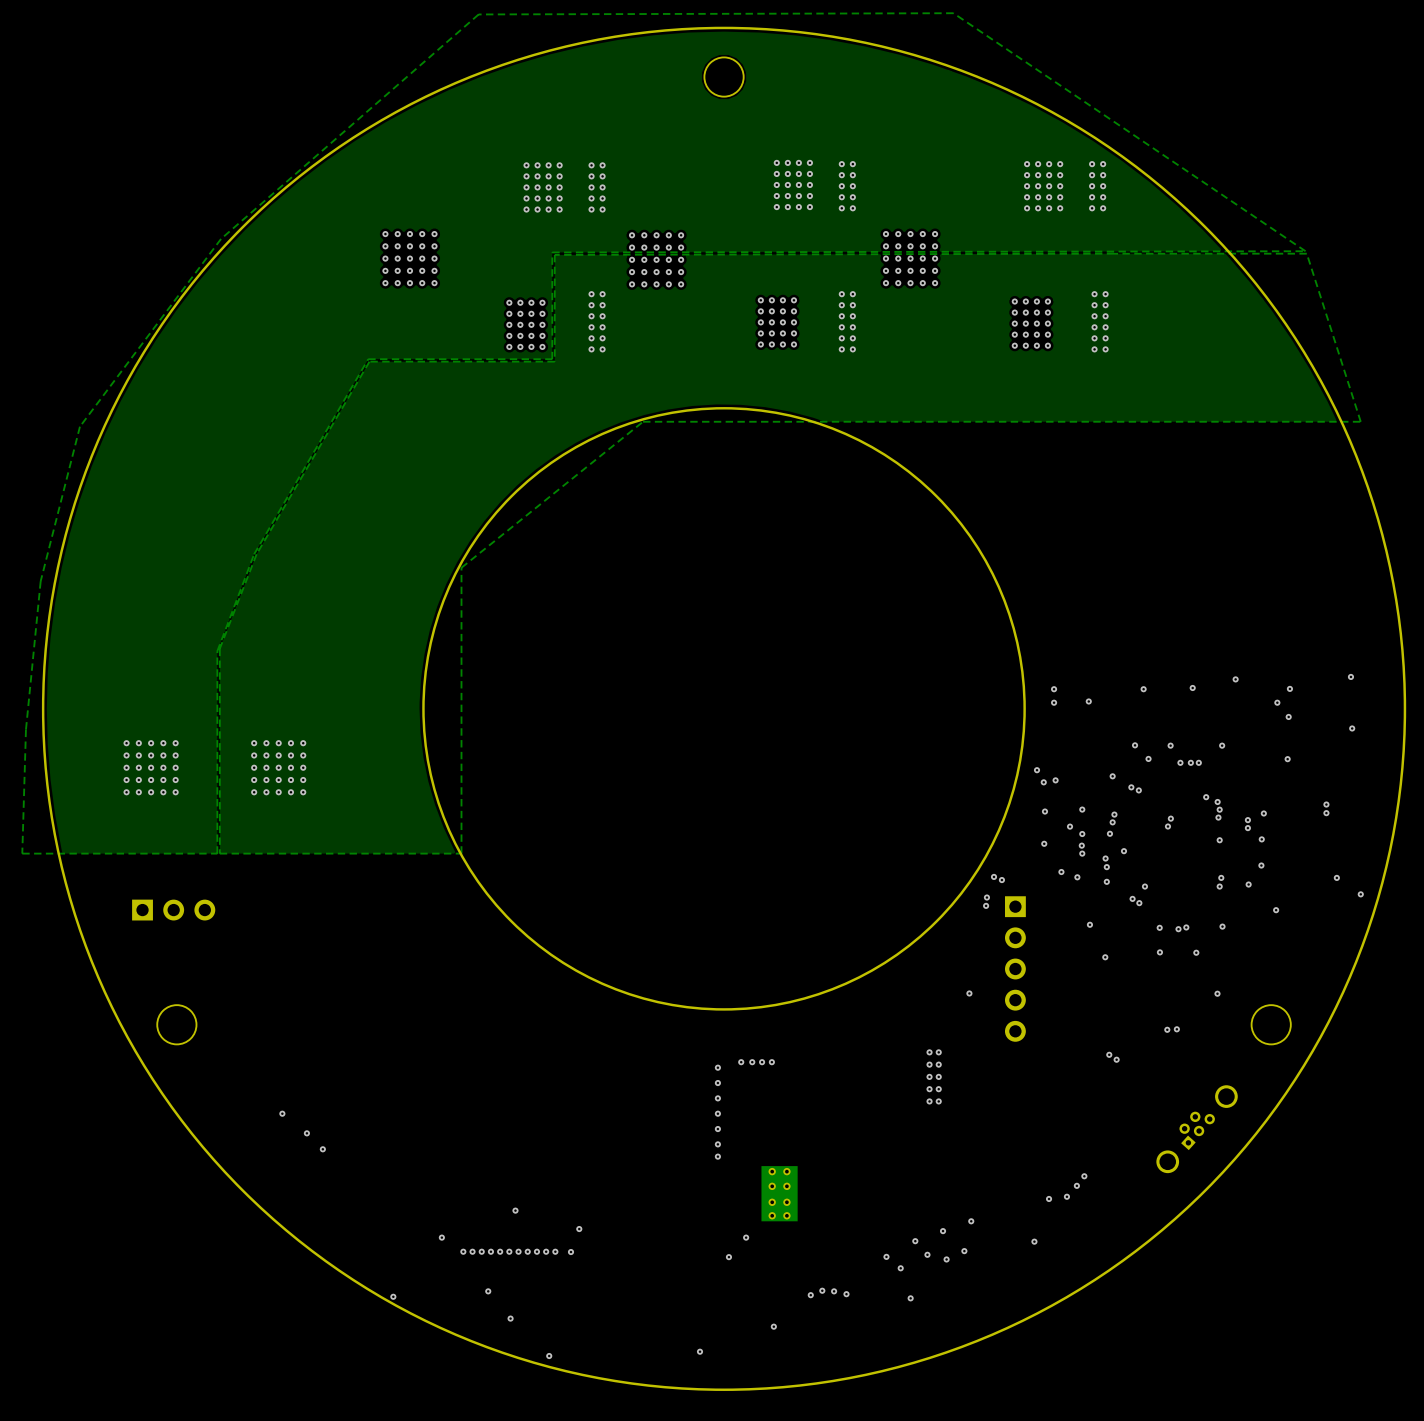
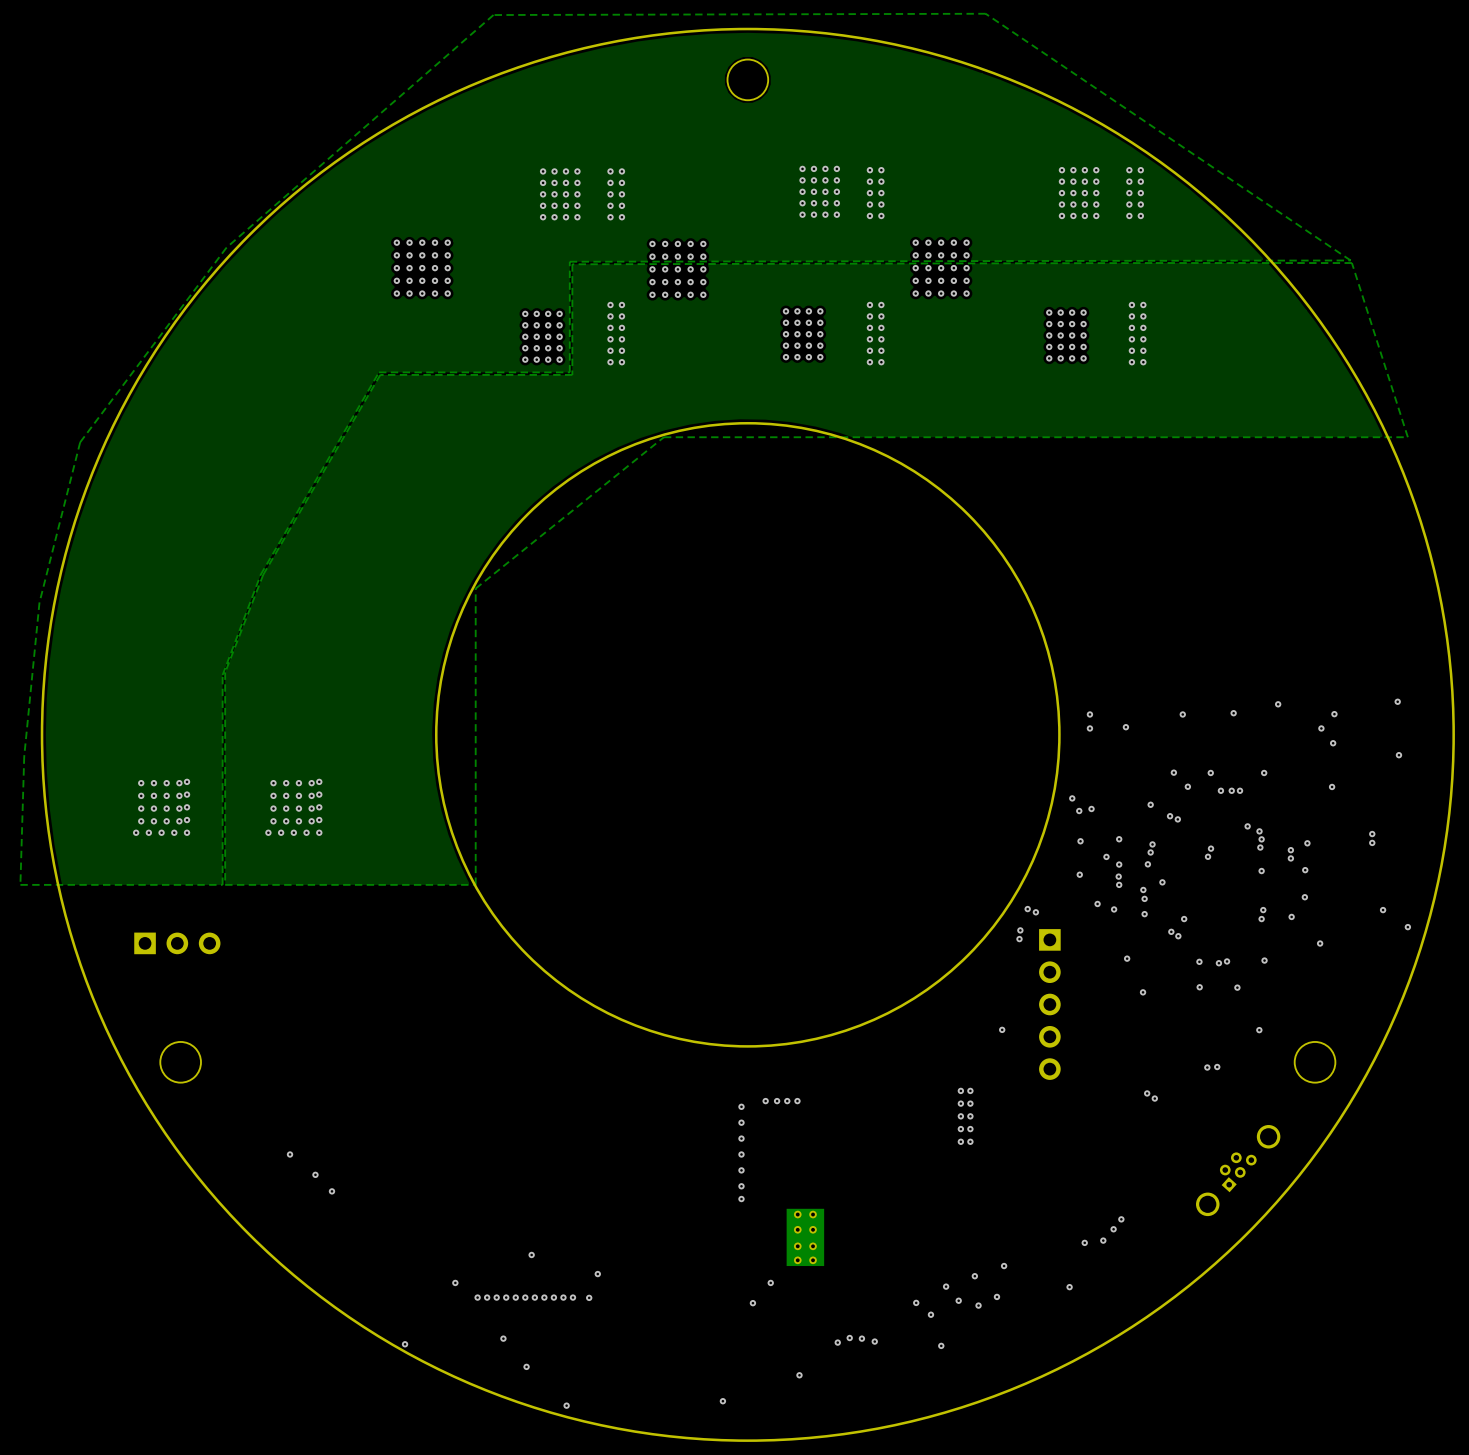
via: (126, 743) -> none
via: (138, 743) -> none
via: (151, 743) -> none
via: (163, 743) -> none
via: (175, 743) -> none
via: (254, 743) -> none
via: (266, 743) -> none
via: (278, 743) -> none
via: (290, 743) -> none
via: (303, 743) -> none
via: none -> (187, 781)
via: none -> (319, 781)
via: (126, 755) -> none
via: (254, 755) -> none
via: none -> (187, 794)
via: none -> (319, 794)
via: (126, 767) -> none
via: (254, 767) -> none
via: none -> (187, 807)
via: none -> (319, 807)
via: (126, 780) -> none
via: (254, 780) -> none
via: none -> (187, 820)
via: none -> (319, 820)
via: (126, 792) -> none
via: (254, 792) -> none
via: none -> (136, 832)
via: none -> (148, 832)
via: none -> (161, 832)
via: none -> (174, 832)
via: none -> (187, 832)
via: none -> (268, 832)
via: none -> (281, 832)
via: none -> (293, 832)
via: none -> (306, 832)
via: none -> (319, 832)

